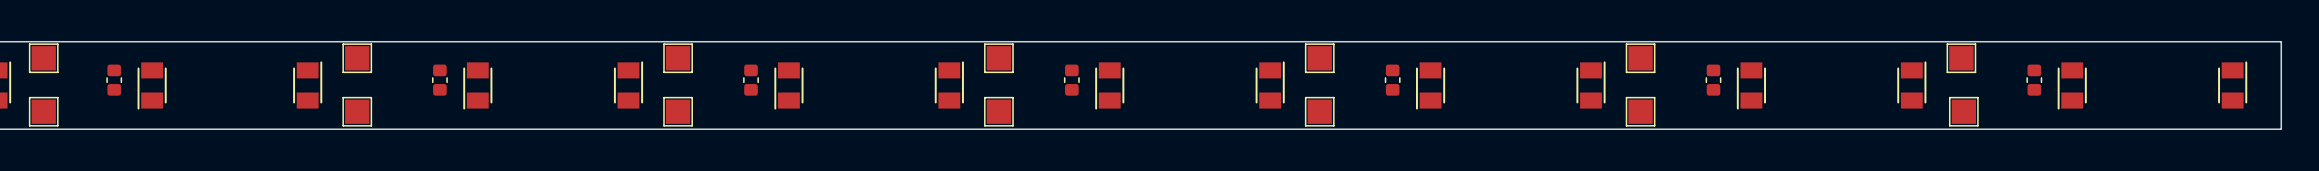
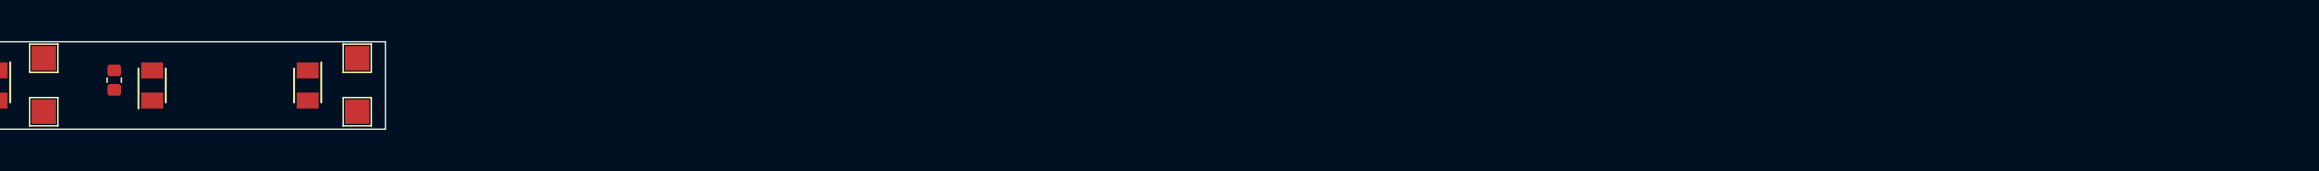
board edge: (385, 41) (2281, 41) (2281, 129) (385, 129) -> (385, 41) (385, 129)
part: (678, 58) -> none
part: (998, 58) -> none
part: (1319, 58) -> none
part: (1640, 58) -> none
part: (1961, 58) -> none
part: (439, 80) -> none
part: (751, 80) -> none
part: (1071, 80) -> none
part: (1392, 80) -> none
part: (1713, 80) -> none
part: (2034, 80) -> none
part: (628, 84) -> none
part: (949, 84) -> none
part: (1270, 84) -> none
part: (1591, 84) -> none
part: (1911, 84) -> none
part: (2232, 84) -> none
part: (477, 85) -> none
part: (788, 85) -> none
part: (1109, 85) -> none
part: (1430, 85) -> none
part: (1751, 85) -> none
part: (2072, 85) -> none
part: (678, 111) -> none
part: (998, 111) -> none
part: (1319, 111) -> none
part: (1640, 111) -> none
part: (1963, 111) -> none

